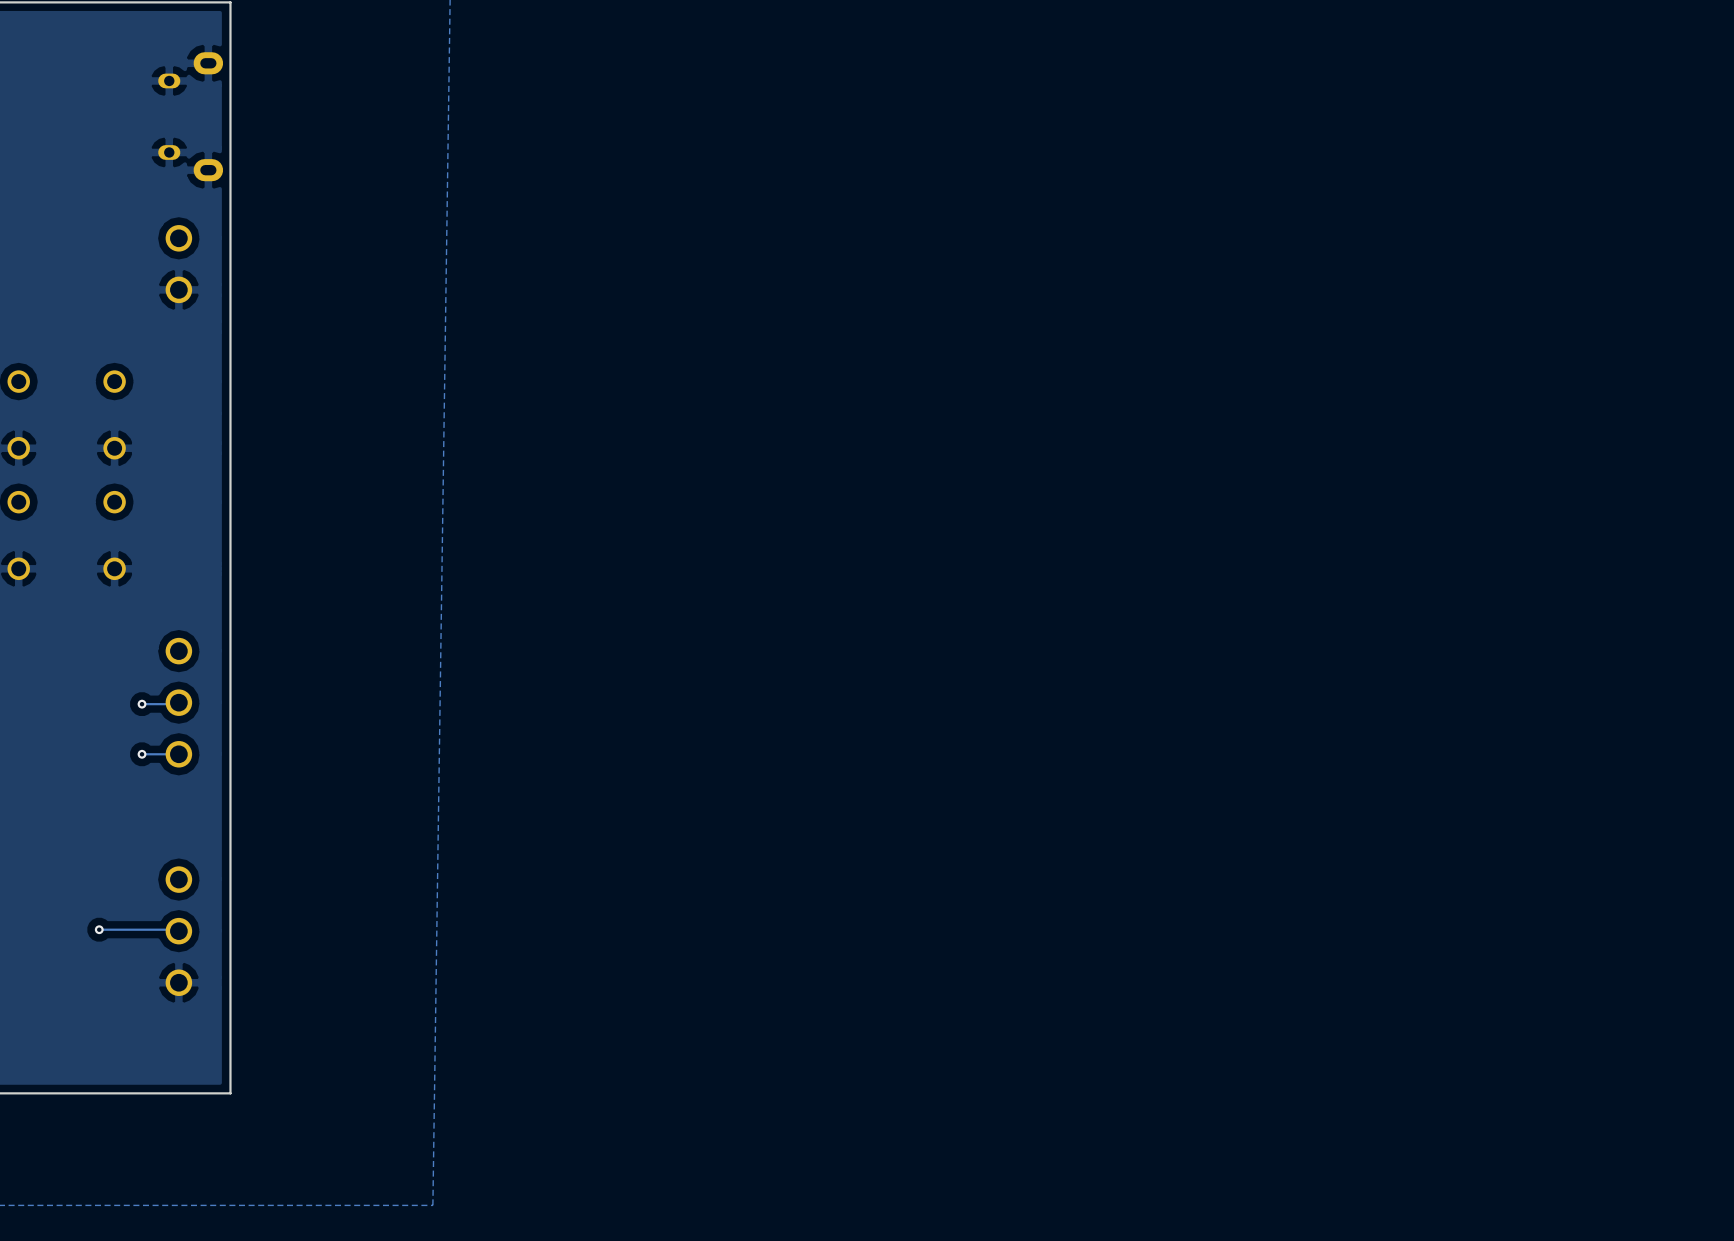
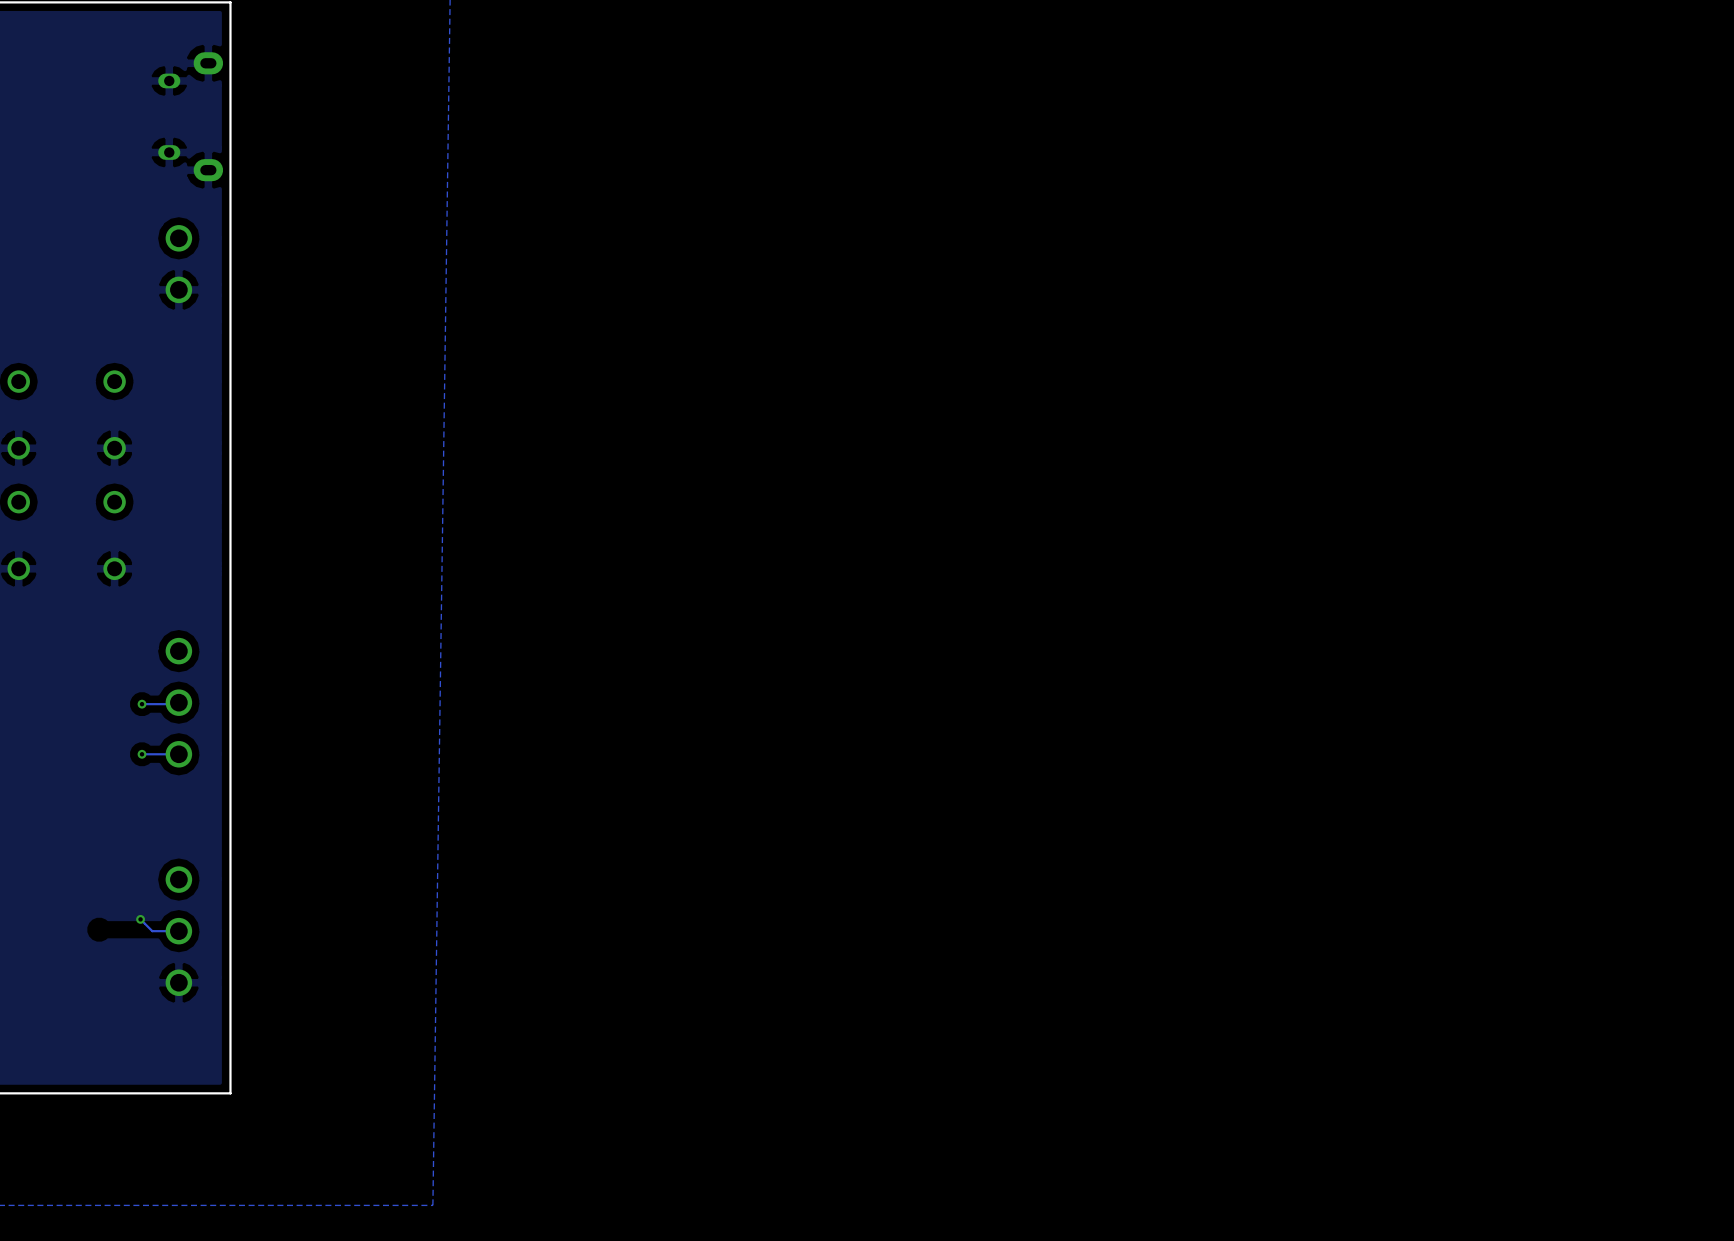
track: (99, 929) (178, 931) -> (140, 919) (152, 931) (178, 931)
via position: (99, 929) -> (140, 919)

